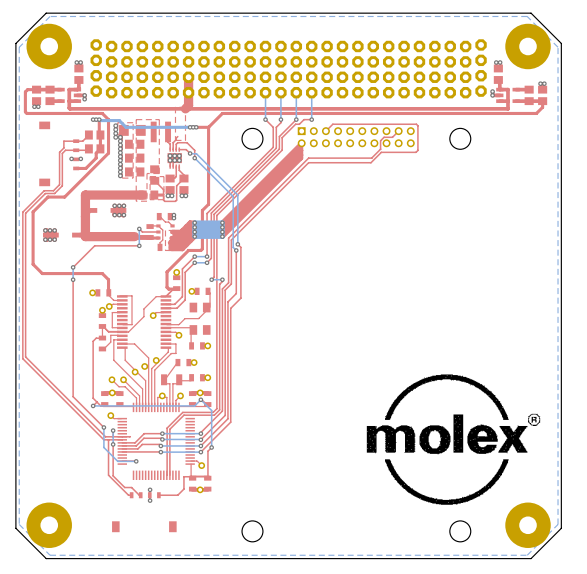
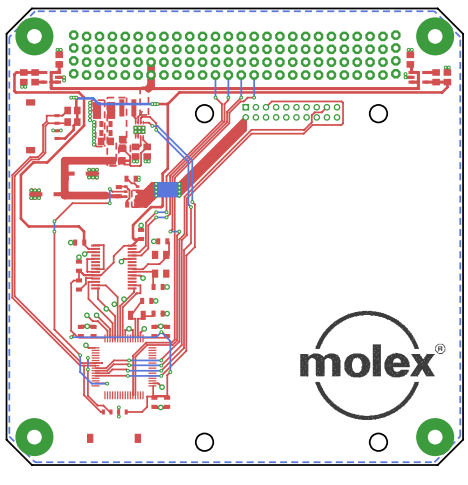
via: (120, 137) -> none
part: none -> (104, 114)
via: none -> (90, 116)
via: (120, 141) -> none
part: (134, 144) -> none
via: (120, 145) -> none
via: none -> (90, 120)
part: none -> (105, 124)
part: (134, 158) -> none
part: none -> (105, 133)

